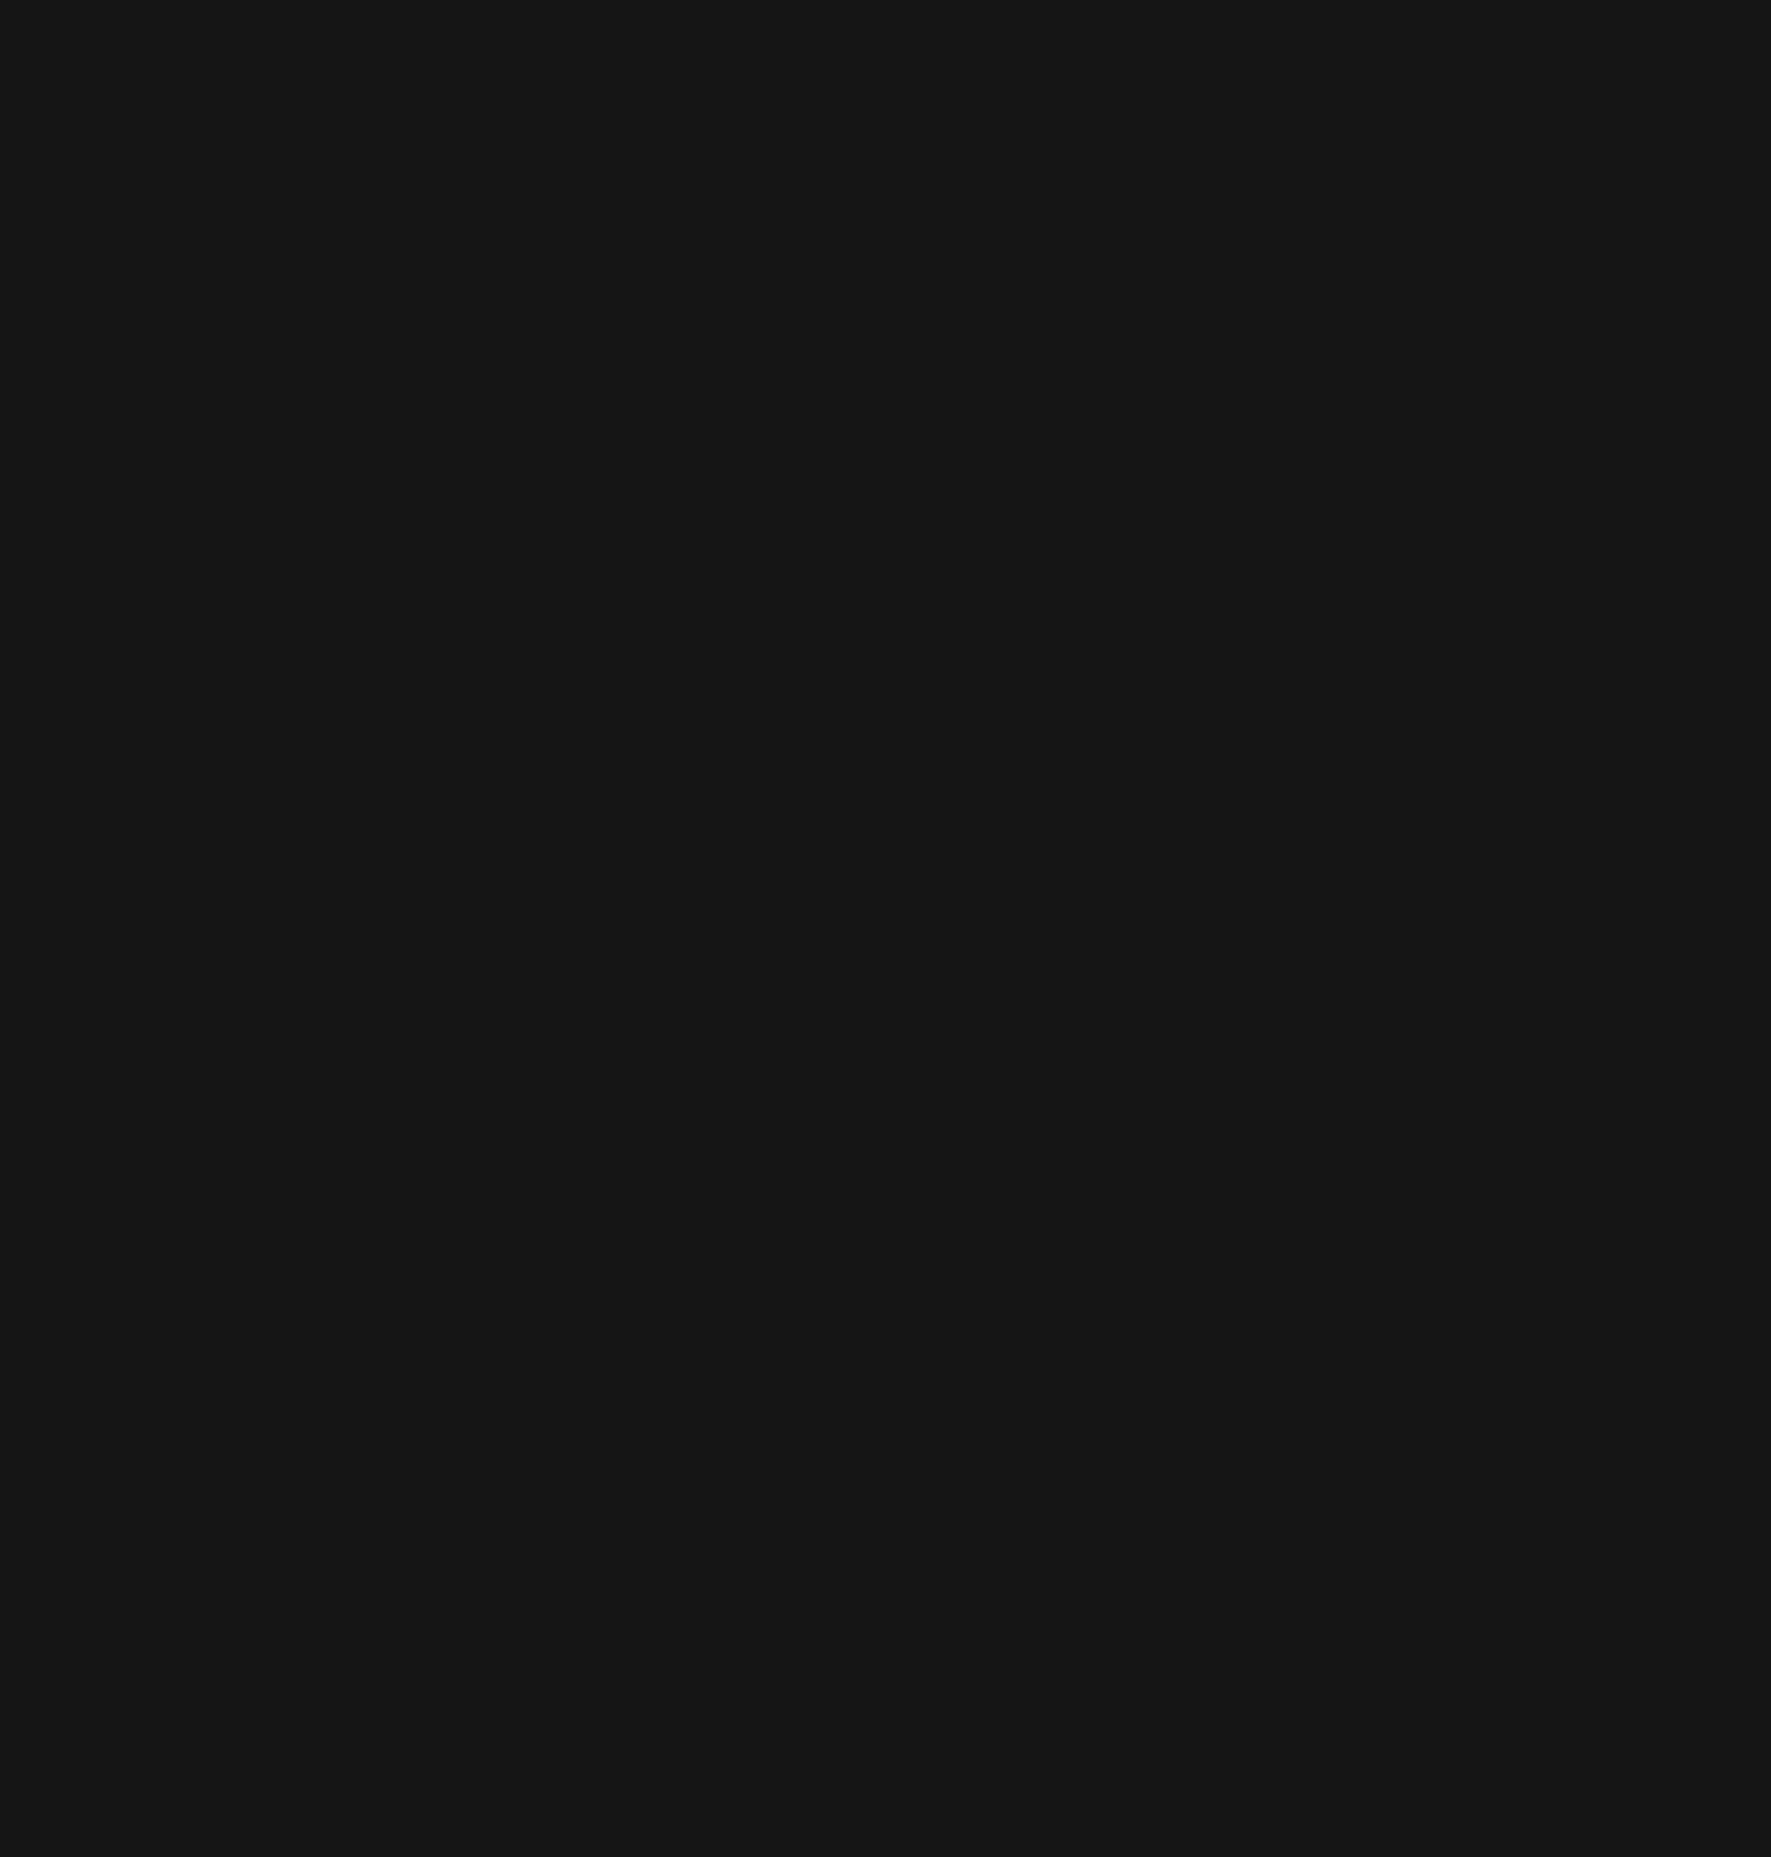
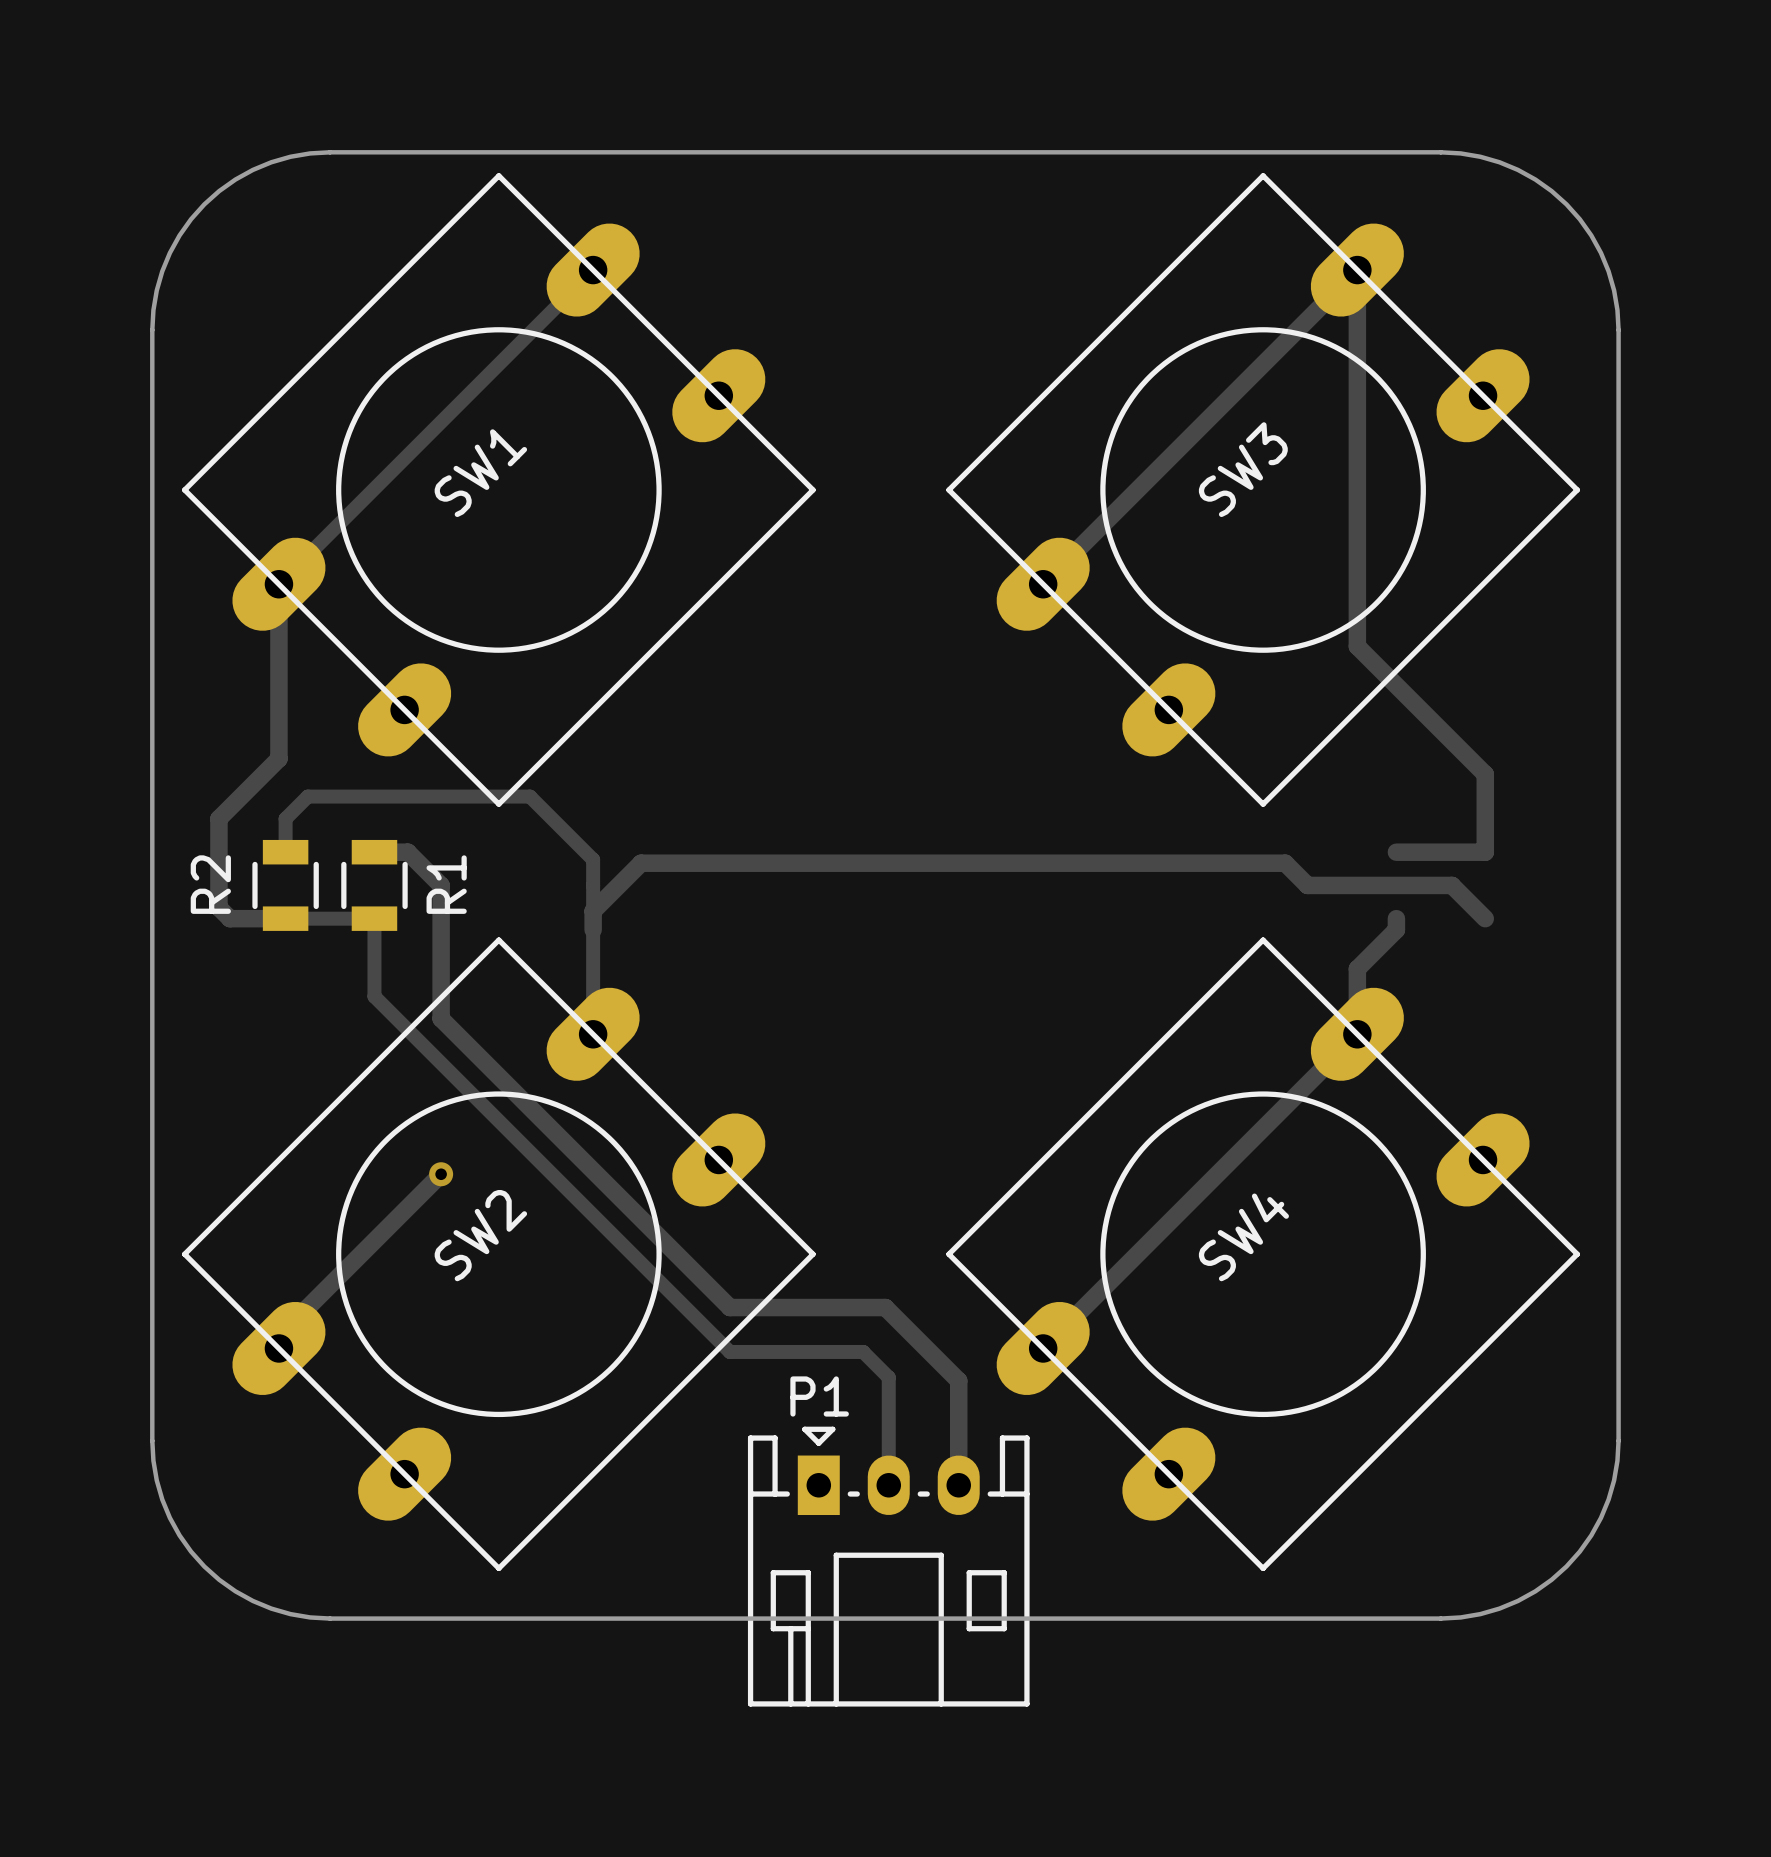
board edge: none -> (330, 152) (1440, 152) (1480, 156) (1517, 169) (1551, 191) (1579, 219) (1591, 235) (1608, 271) (1617, 310) (1618, 330) (1618, 1440) (1614, 1480) (1600, 1517) (1579, 1551) (1551, 1579) (1517, 1600) (1499, 1608) (1460, 1617) (1440, 1618) (330, 1618) (290, 1614) (252, 1600) (219, 1579) (191, 1551) (179, 1535) (162, 1499) (153, 1460) (152, 1440) (153, 310) (156, 290) (169, 252) (191, 219) (219, 191) (235, 179) (271, 162) (310, 153) (330, 152)
track: none -> (593, 270) (278, 584) (278, 758) (218, 818) (218, 907) (229, 918) (374, 918) (374, 996) (729, 1351) (863, 1351) (888, 1377) (888, 1485)
SW1: none -> (498, 489)
SW3: none -> (1263, 489)
track: none -> (1043, 584) (1357, 270) (1357, 646) (1485, 774) (1485, 852) (1396, 852)
track: none -> (285, 852) (285, 818) (307, 796) (529, 796) (593, 859) (593, 1034)
track: none -> (374, 852) (407, 852) (441, 885) (441, 1018) (729, 1307) (885, 1307) (958, 1380) (958, 1485)
R2: none -> (285, 885)
R1: none -> (374, 885)
track: none -> (1396, 918) (1396, 929) (1357, 968) (1357, 1034) (1043, 1348)
track: none -> (1485, 918) (1452, 885) (1307, 885) (1285, 863) (641, 863) (593, 911) (593, 929)
track: none -> (441, 1174) (278, 1336) (278, 1348)
via: none -> (441, 1174)
SW2: none -> (498, 1254)
SW4: none -> (1263, 1254)
P1: none -> (888, 1566)

